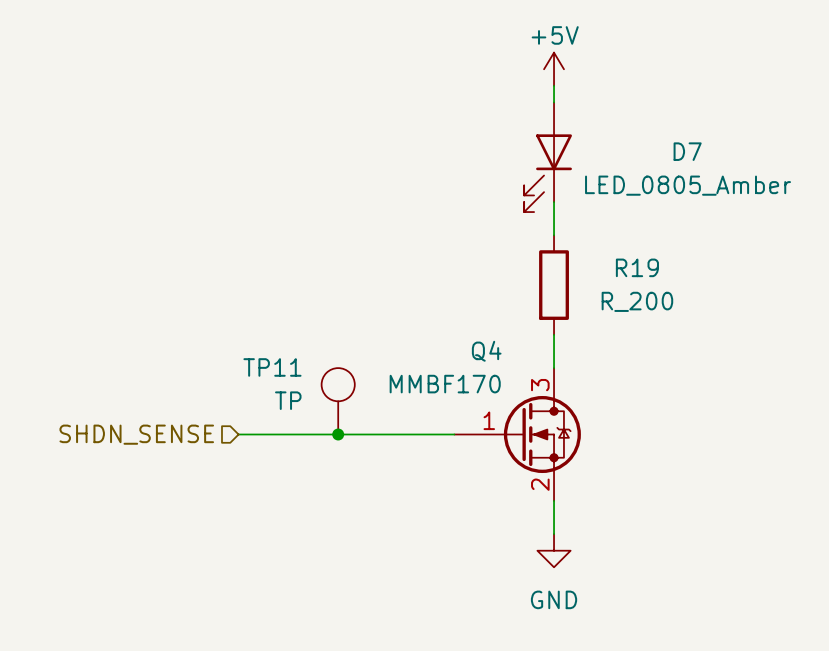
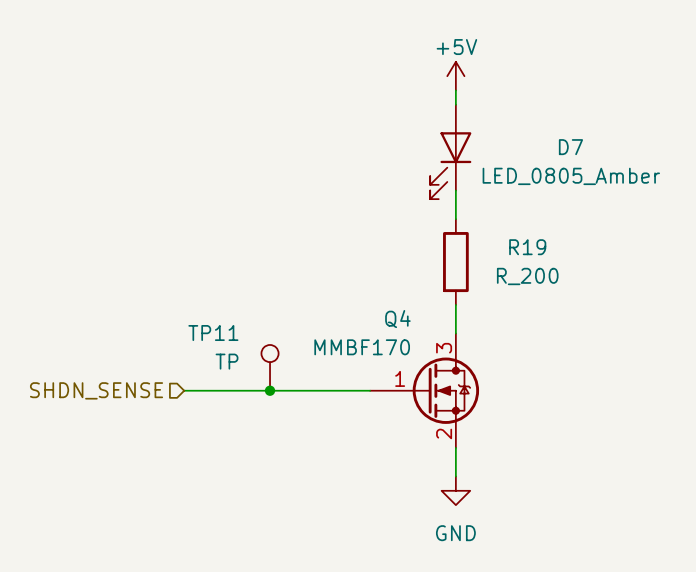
TP11 symbol: [321, 368, 355, 435] -> [261, 344, 279, 391]

